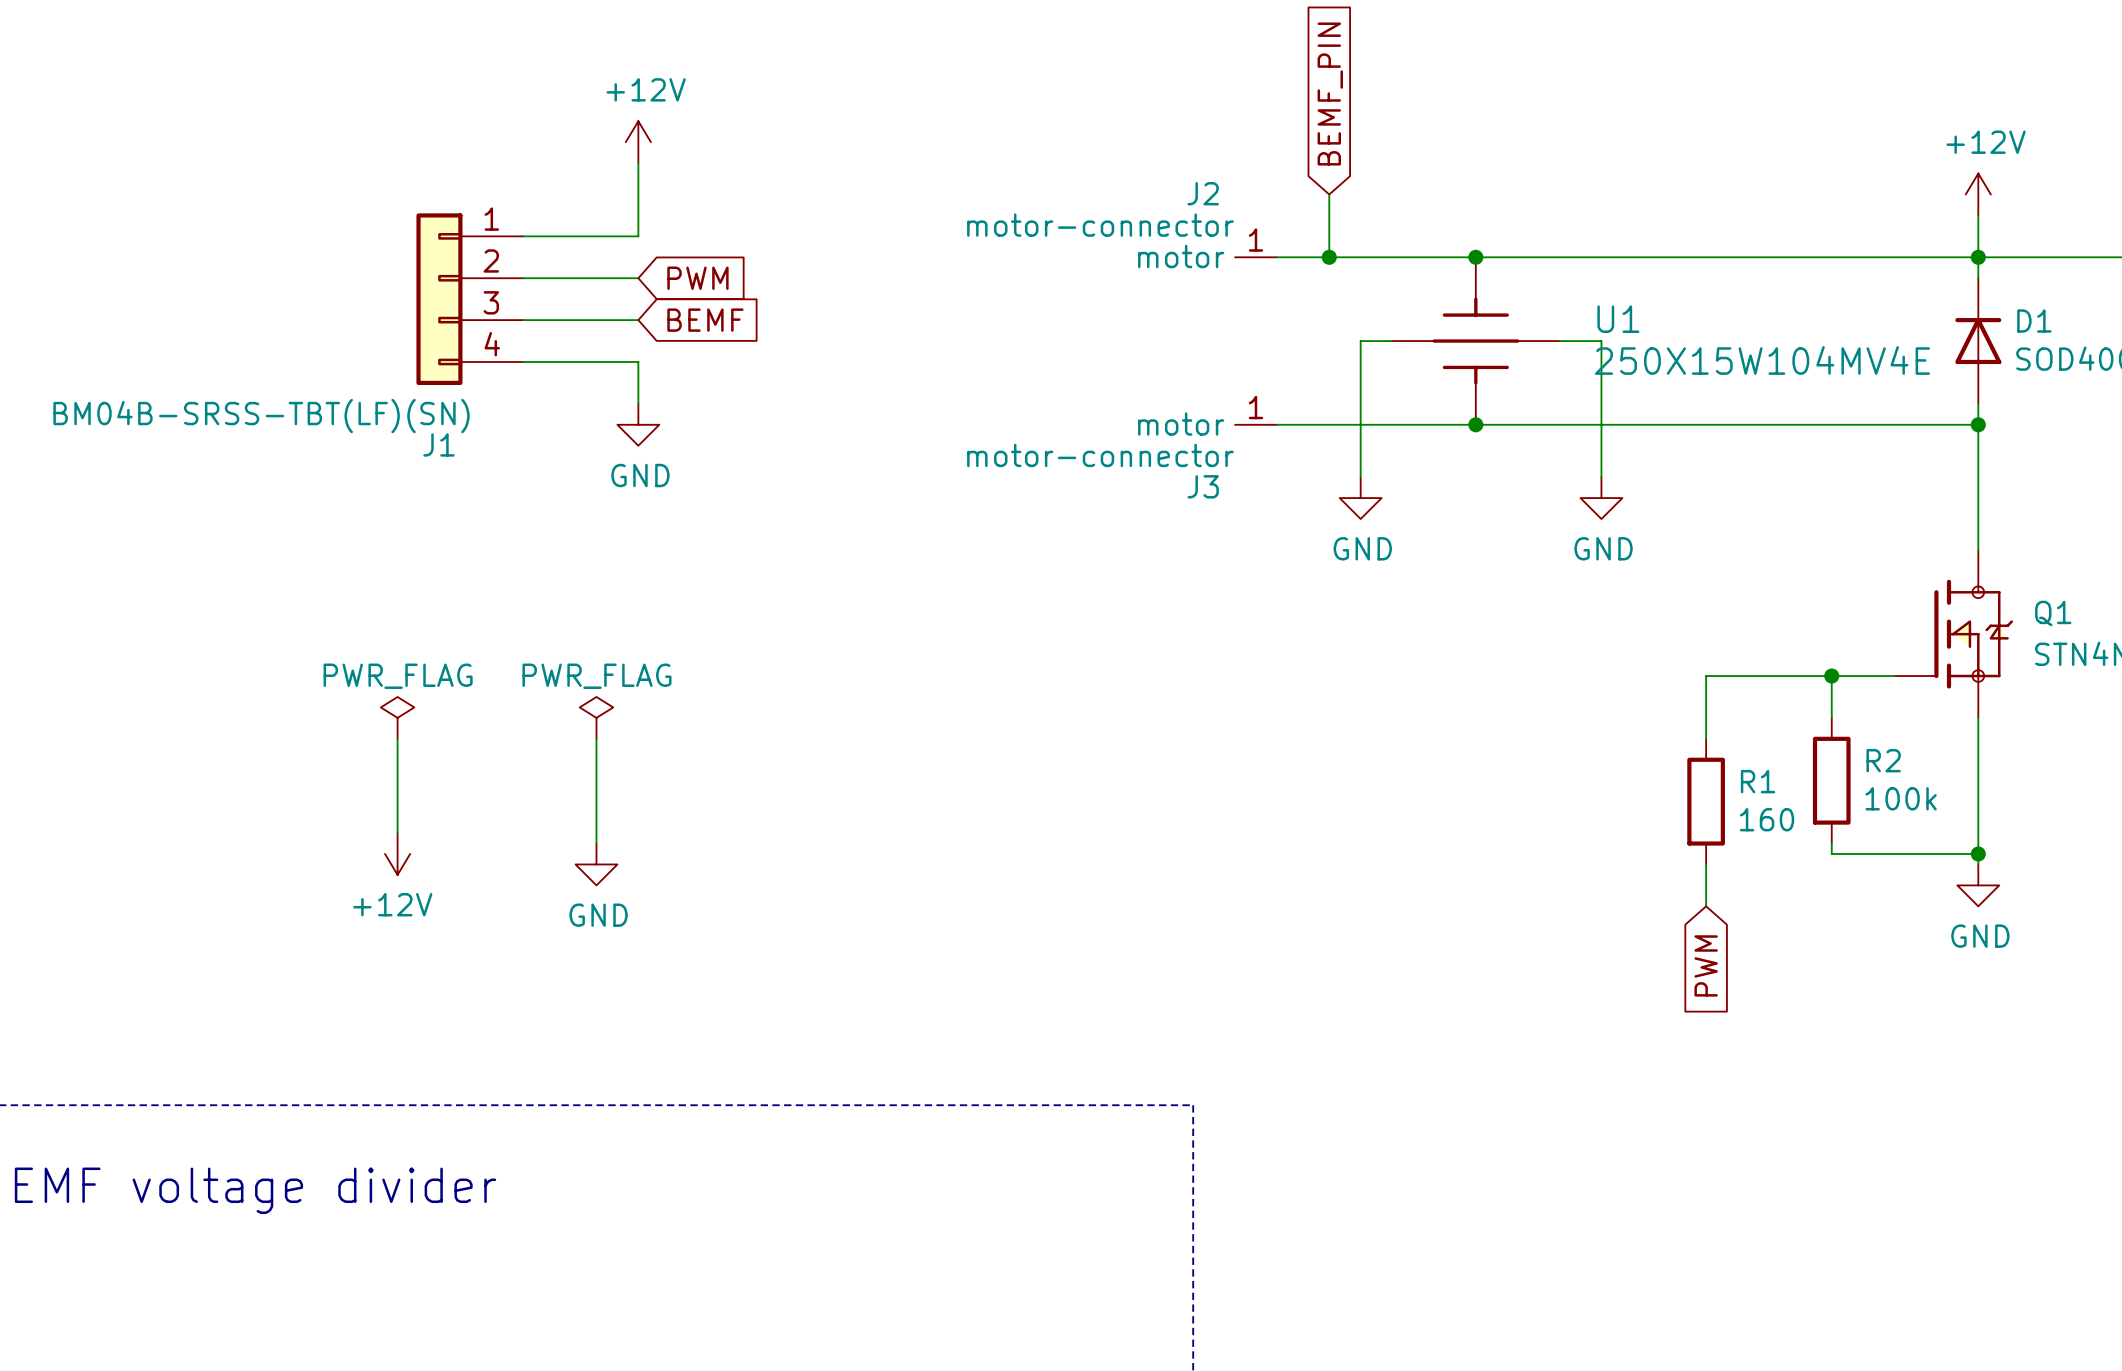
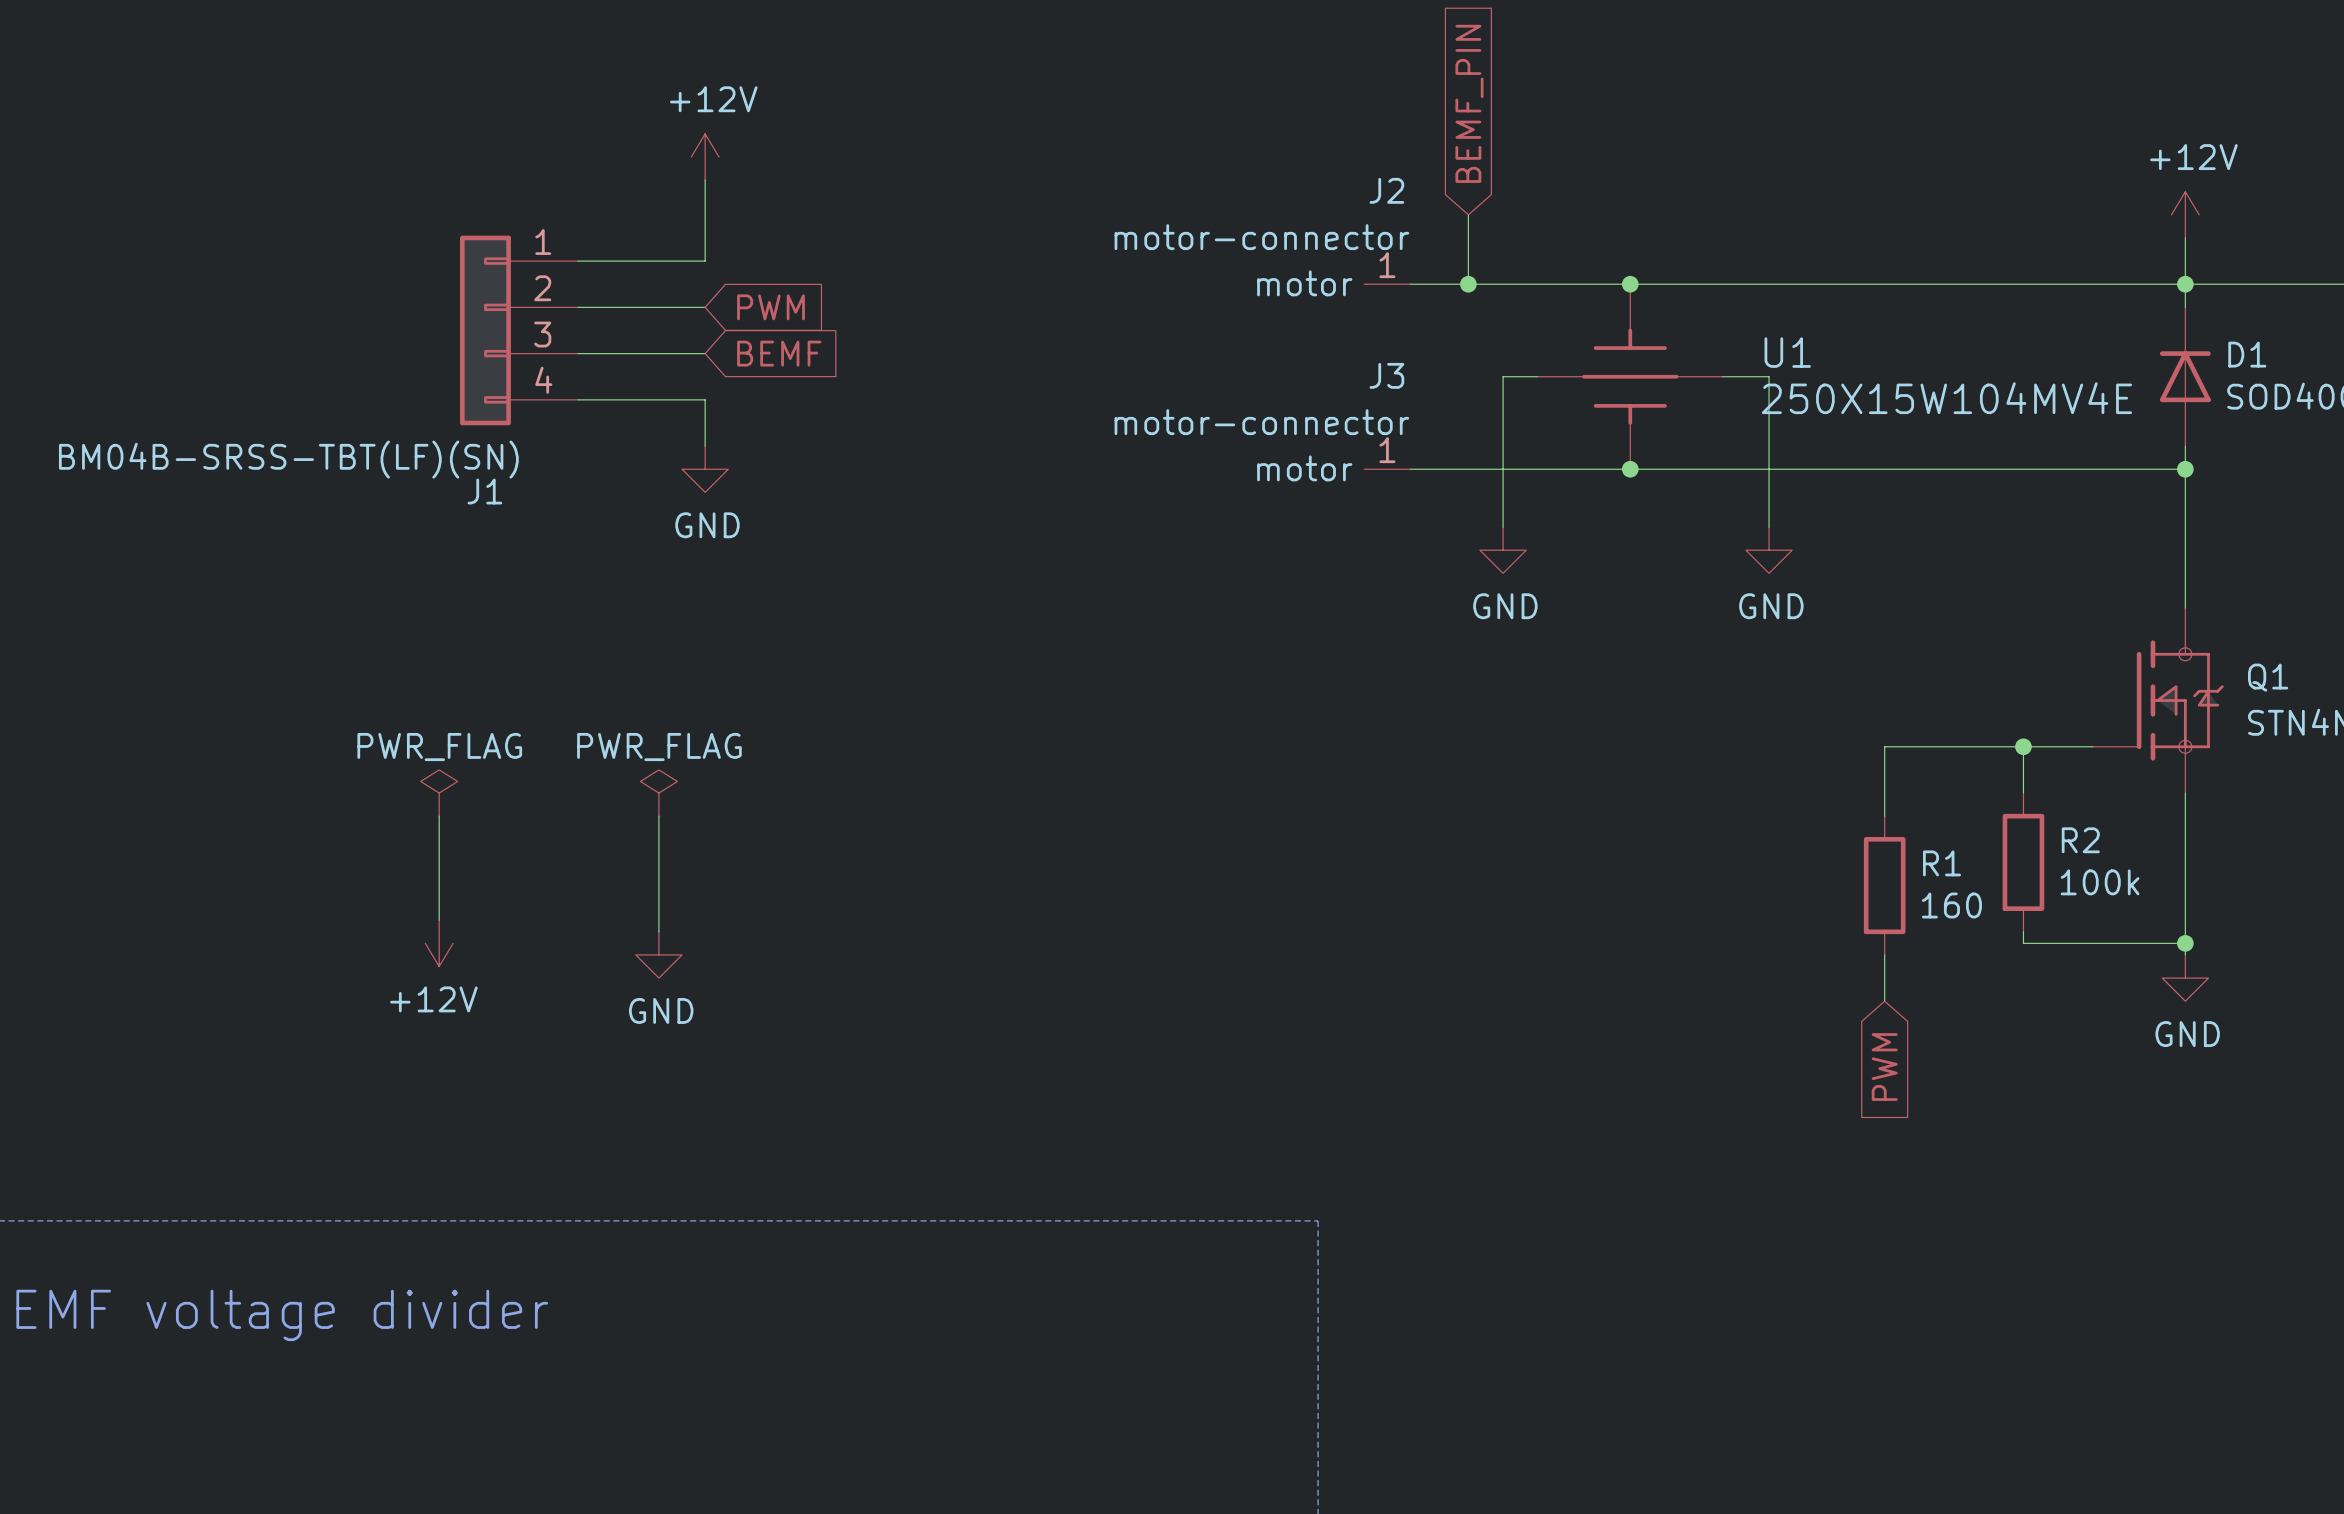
J2 name position: J2 (1203, 193) -> J2 (1386, 190)
J2 value position: motor-connector (1100, 225) -> motor-connector (1261, 237)
J3 value position: motor-connector (1100, 455) -> motor-connector (1261, 422)
J3 name position: J3 (1203, 486) -> J3 (1386, 375)

